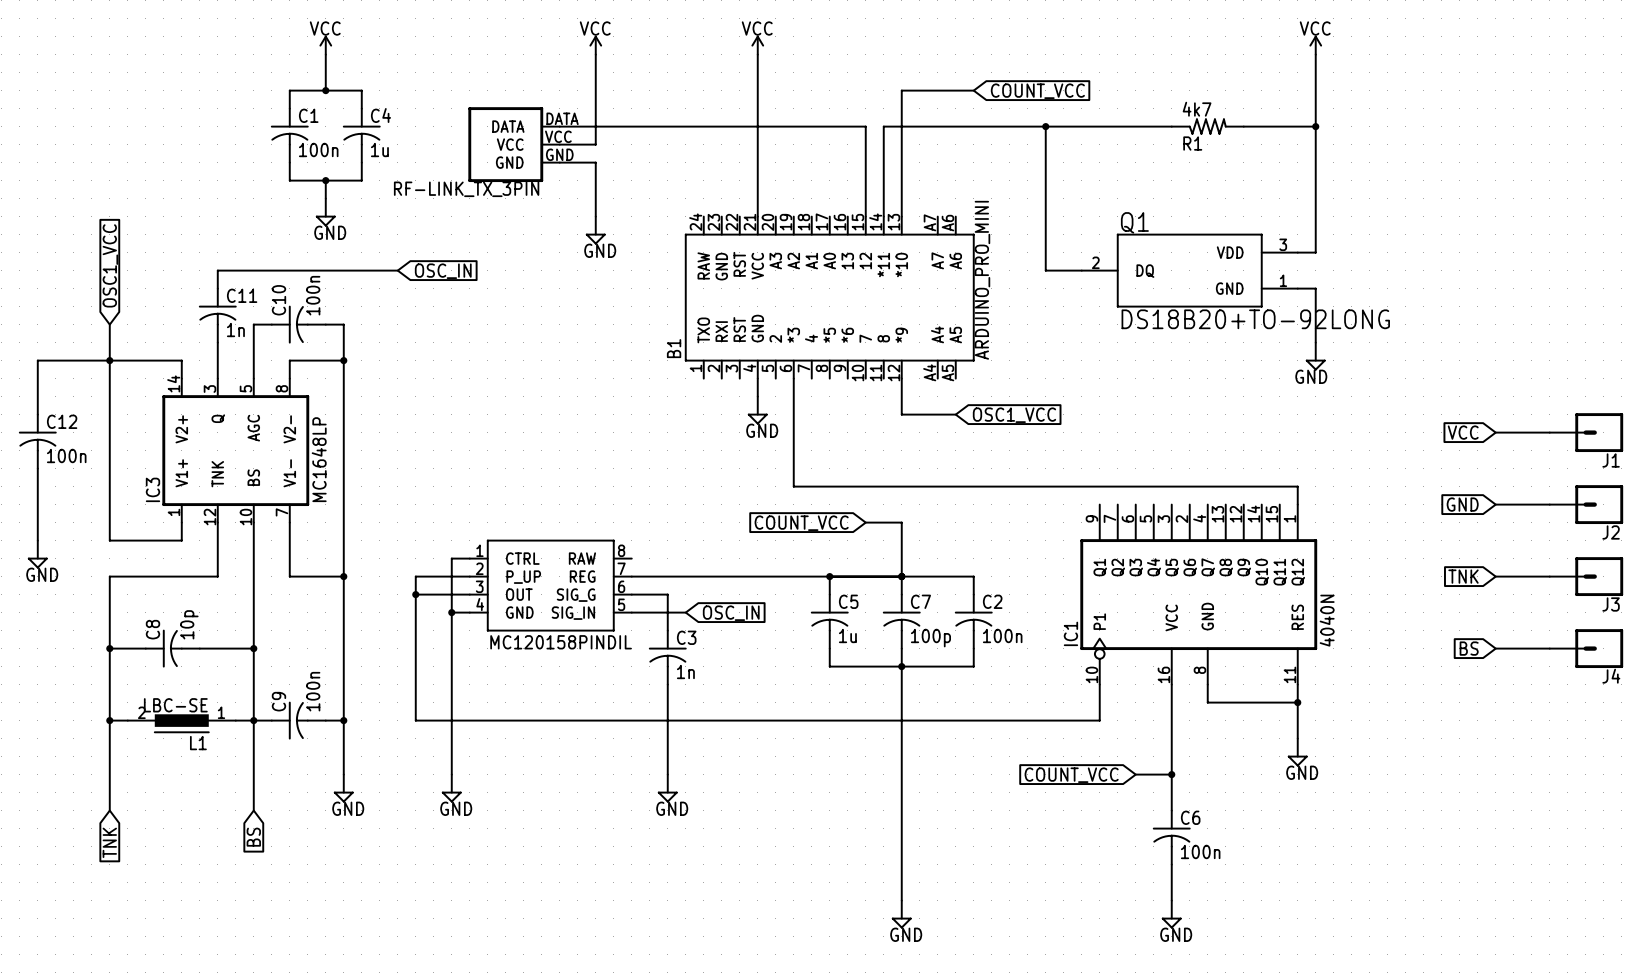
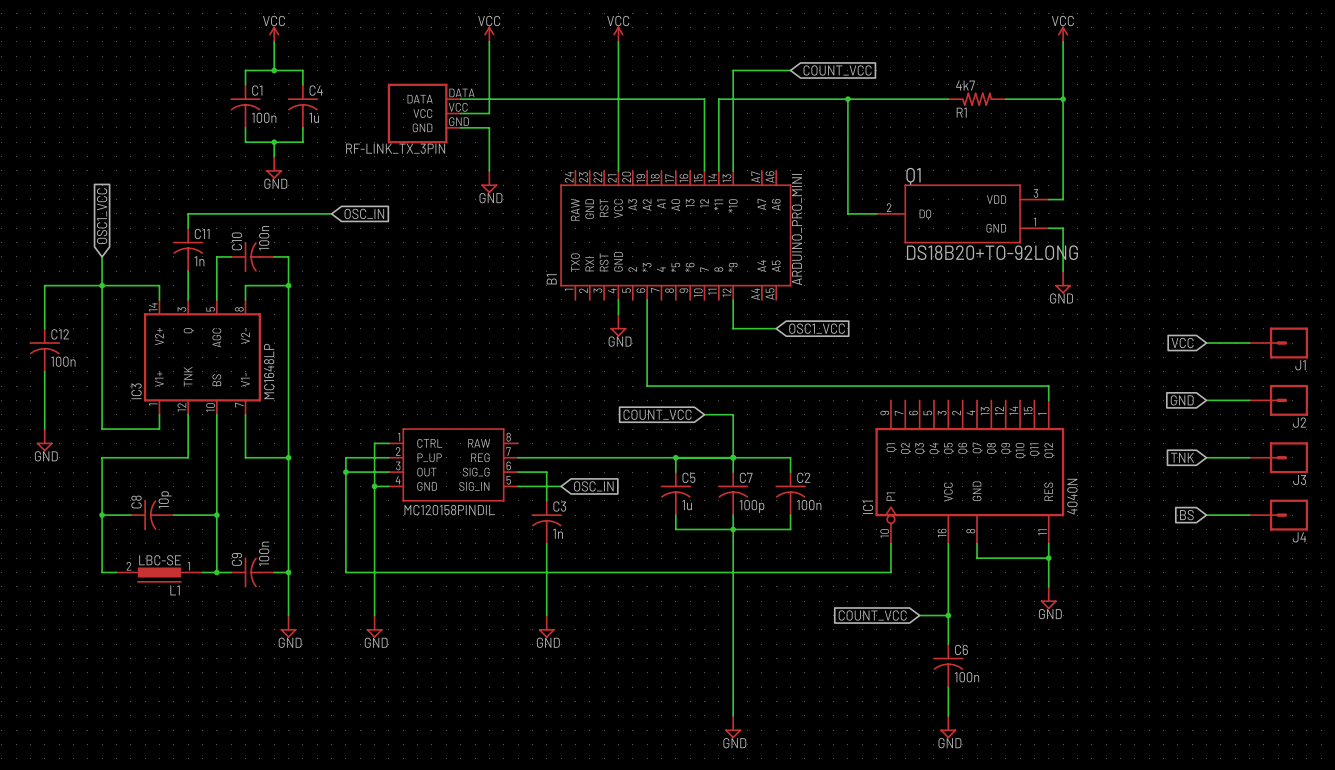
wire: (109, 720) (109, 810) -> none
junction: (109, 720) -> none
wire: (253, 720) (253, 810) -> none
global label: BS (253, 837) -> none
global label: TNK (109, 842) -> none

